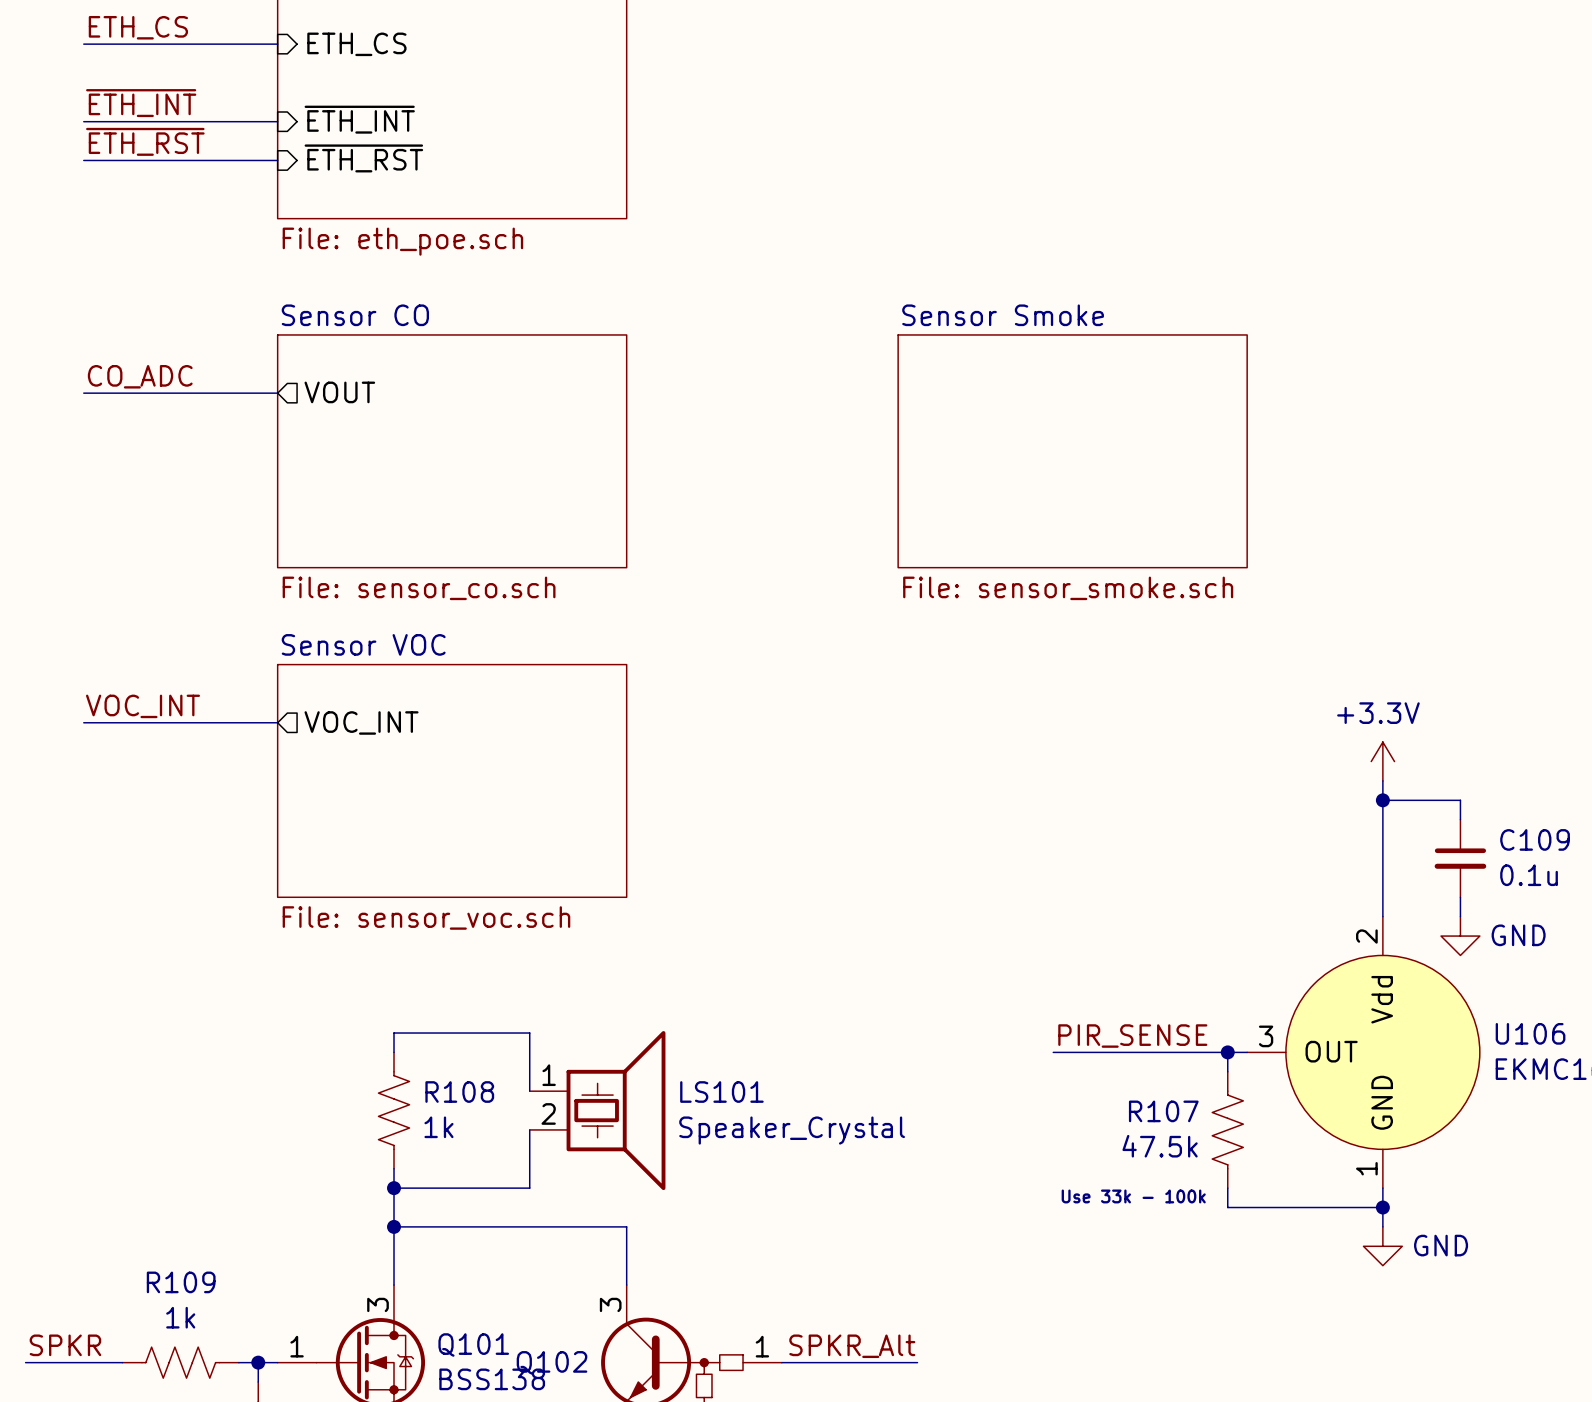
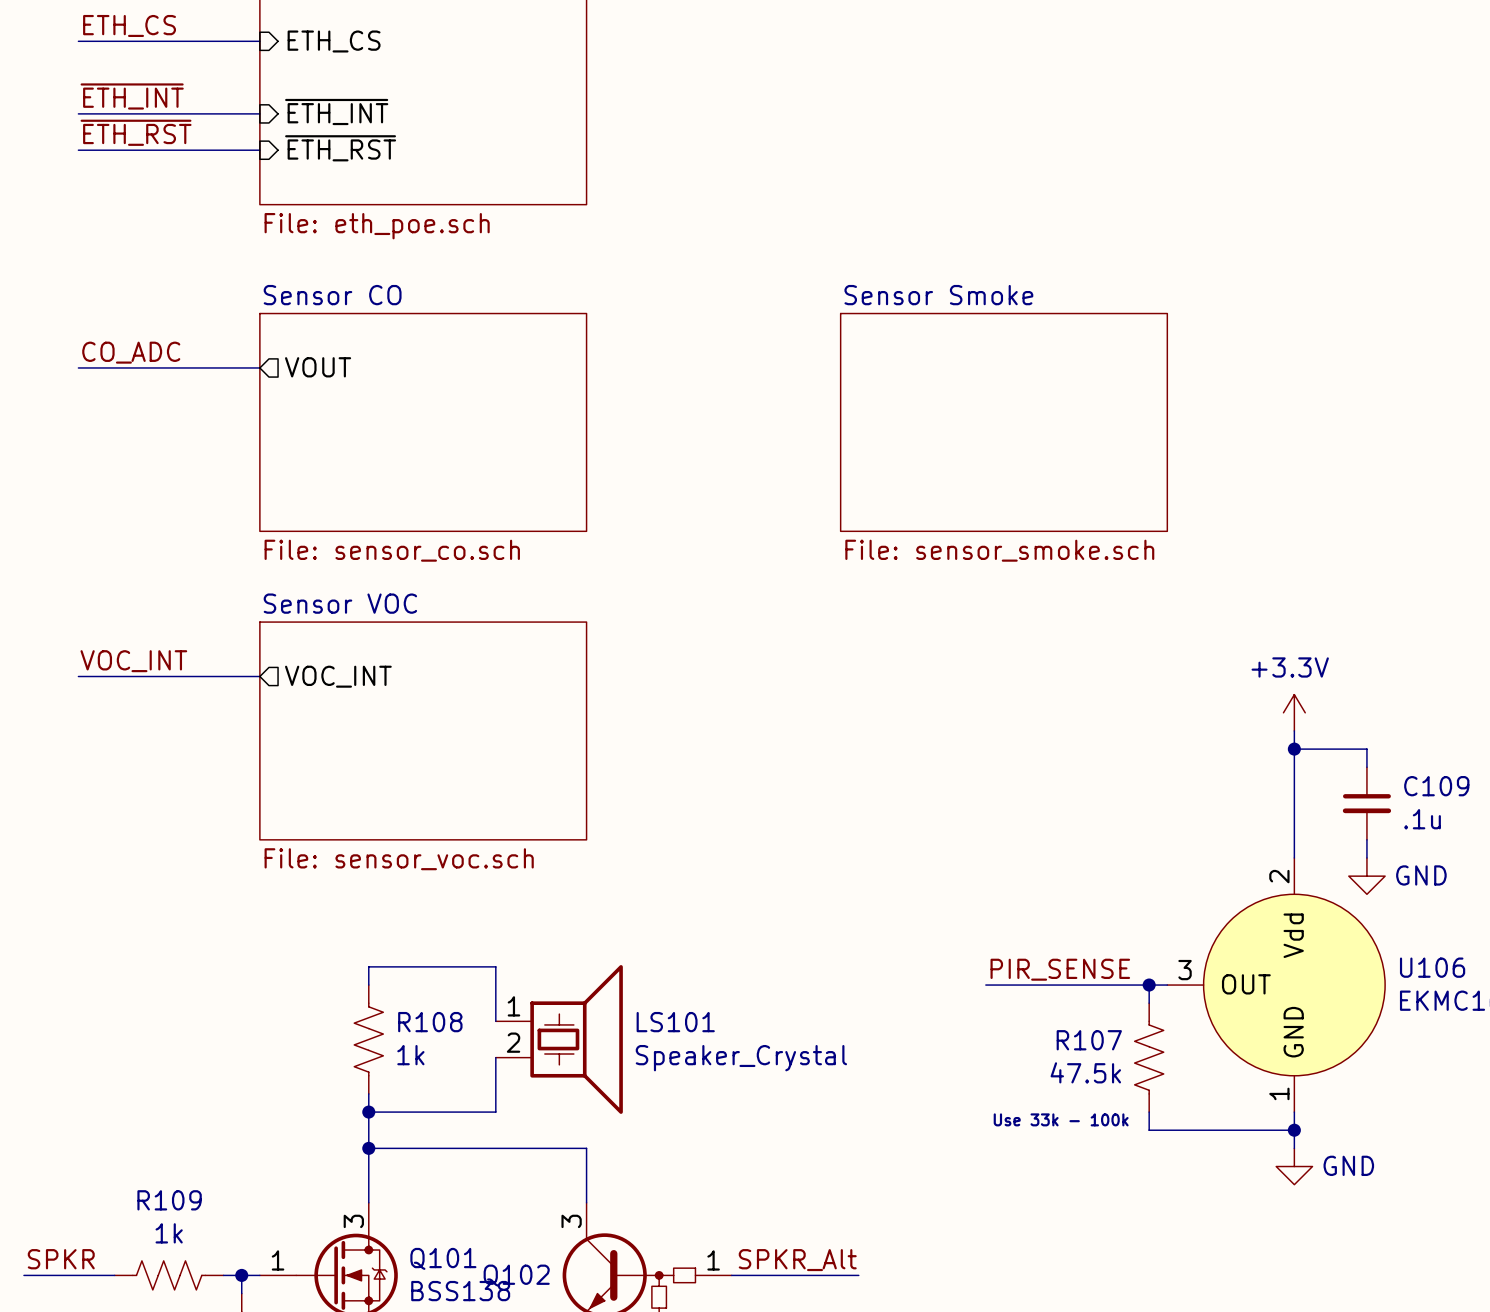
C109 value: 0.1u (1529, 875) -> .1u (1422, 819)

